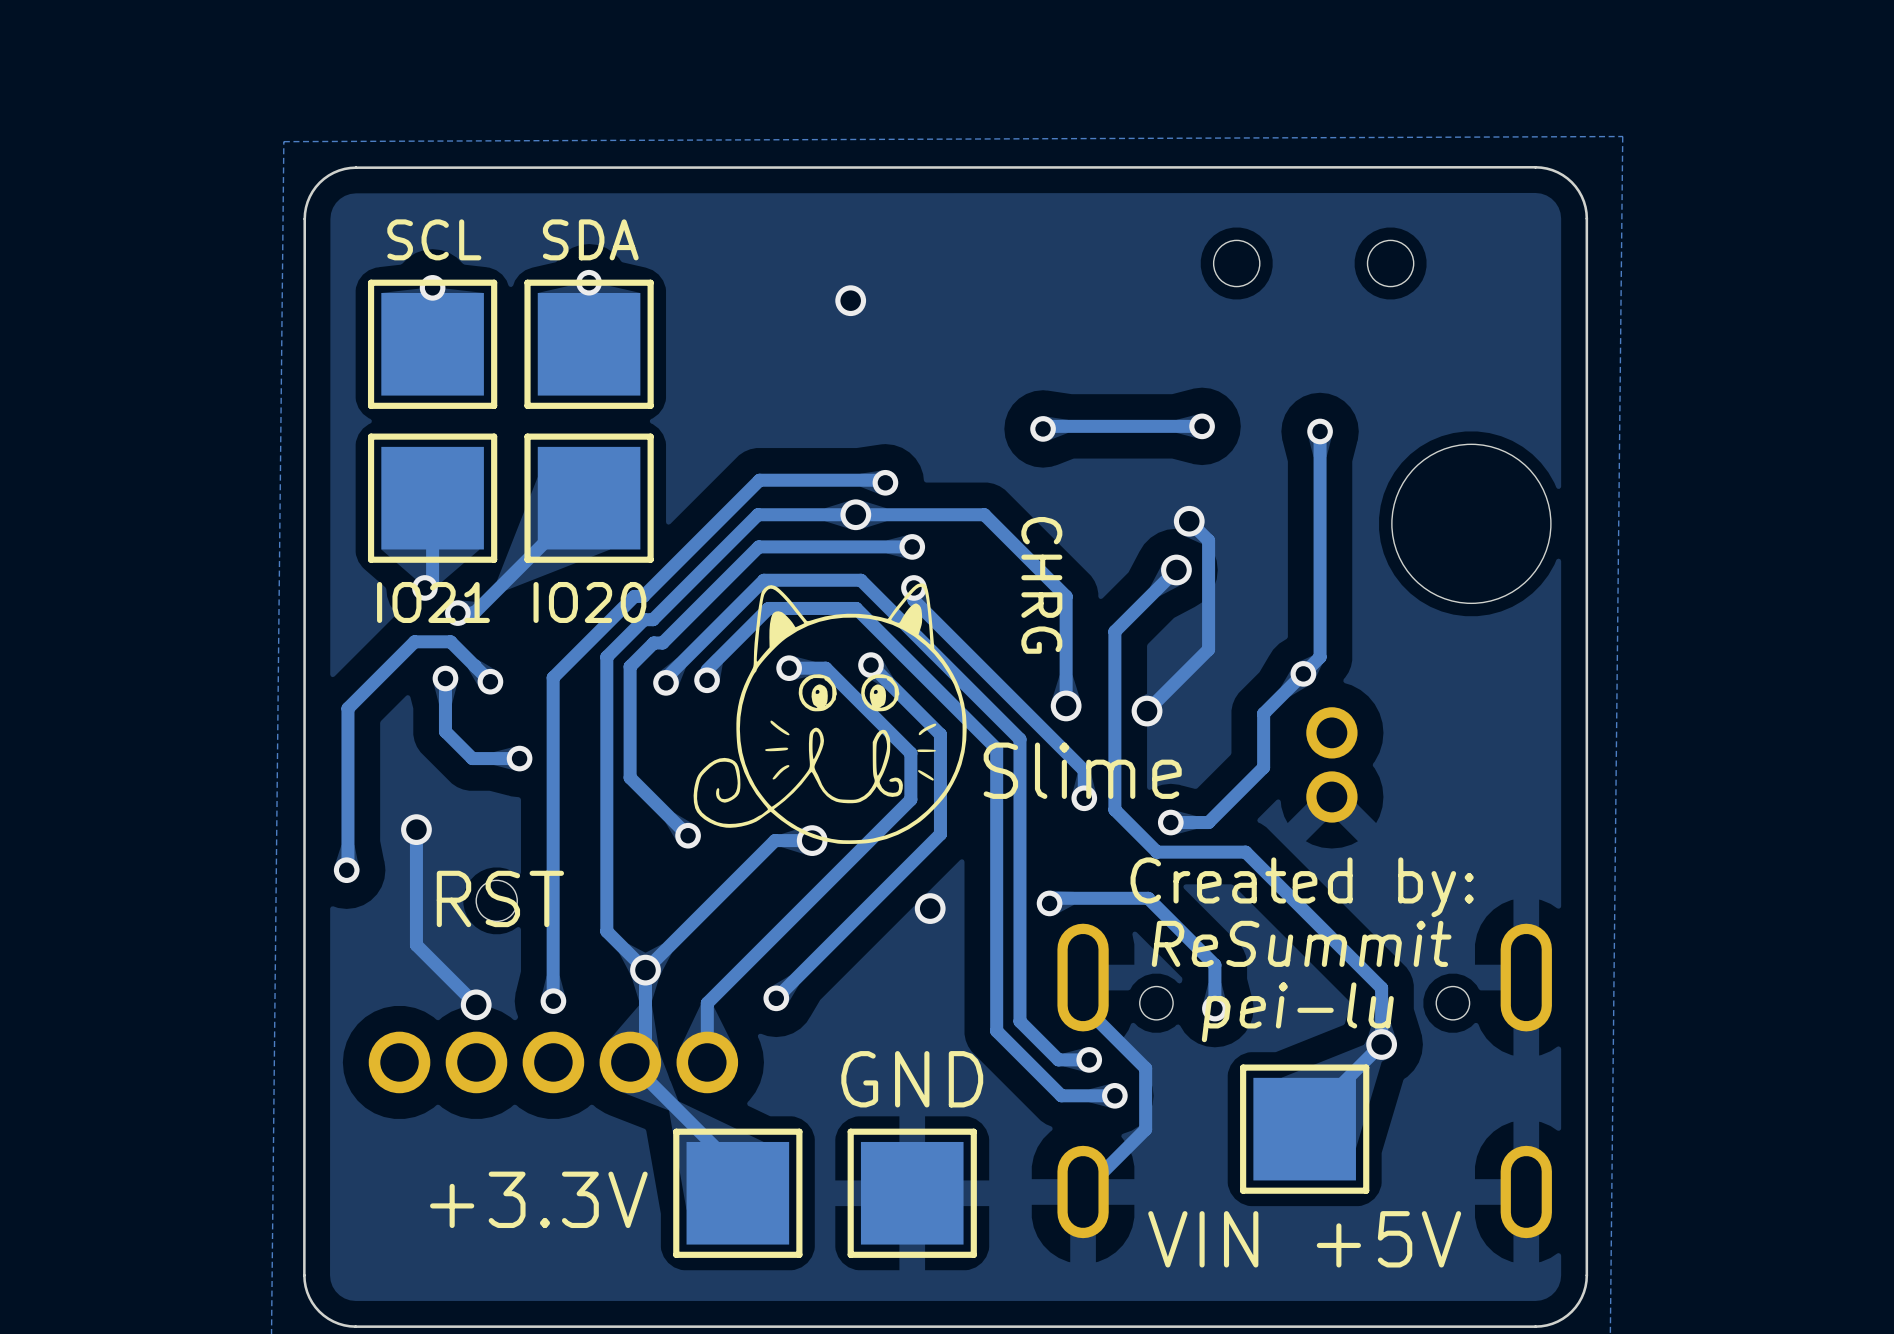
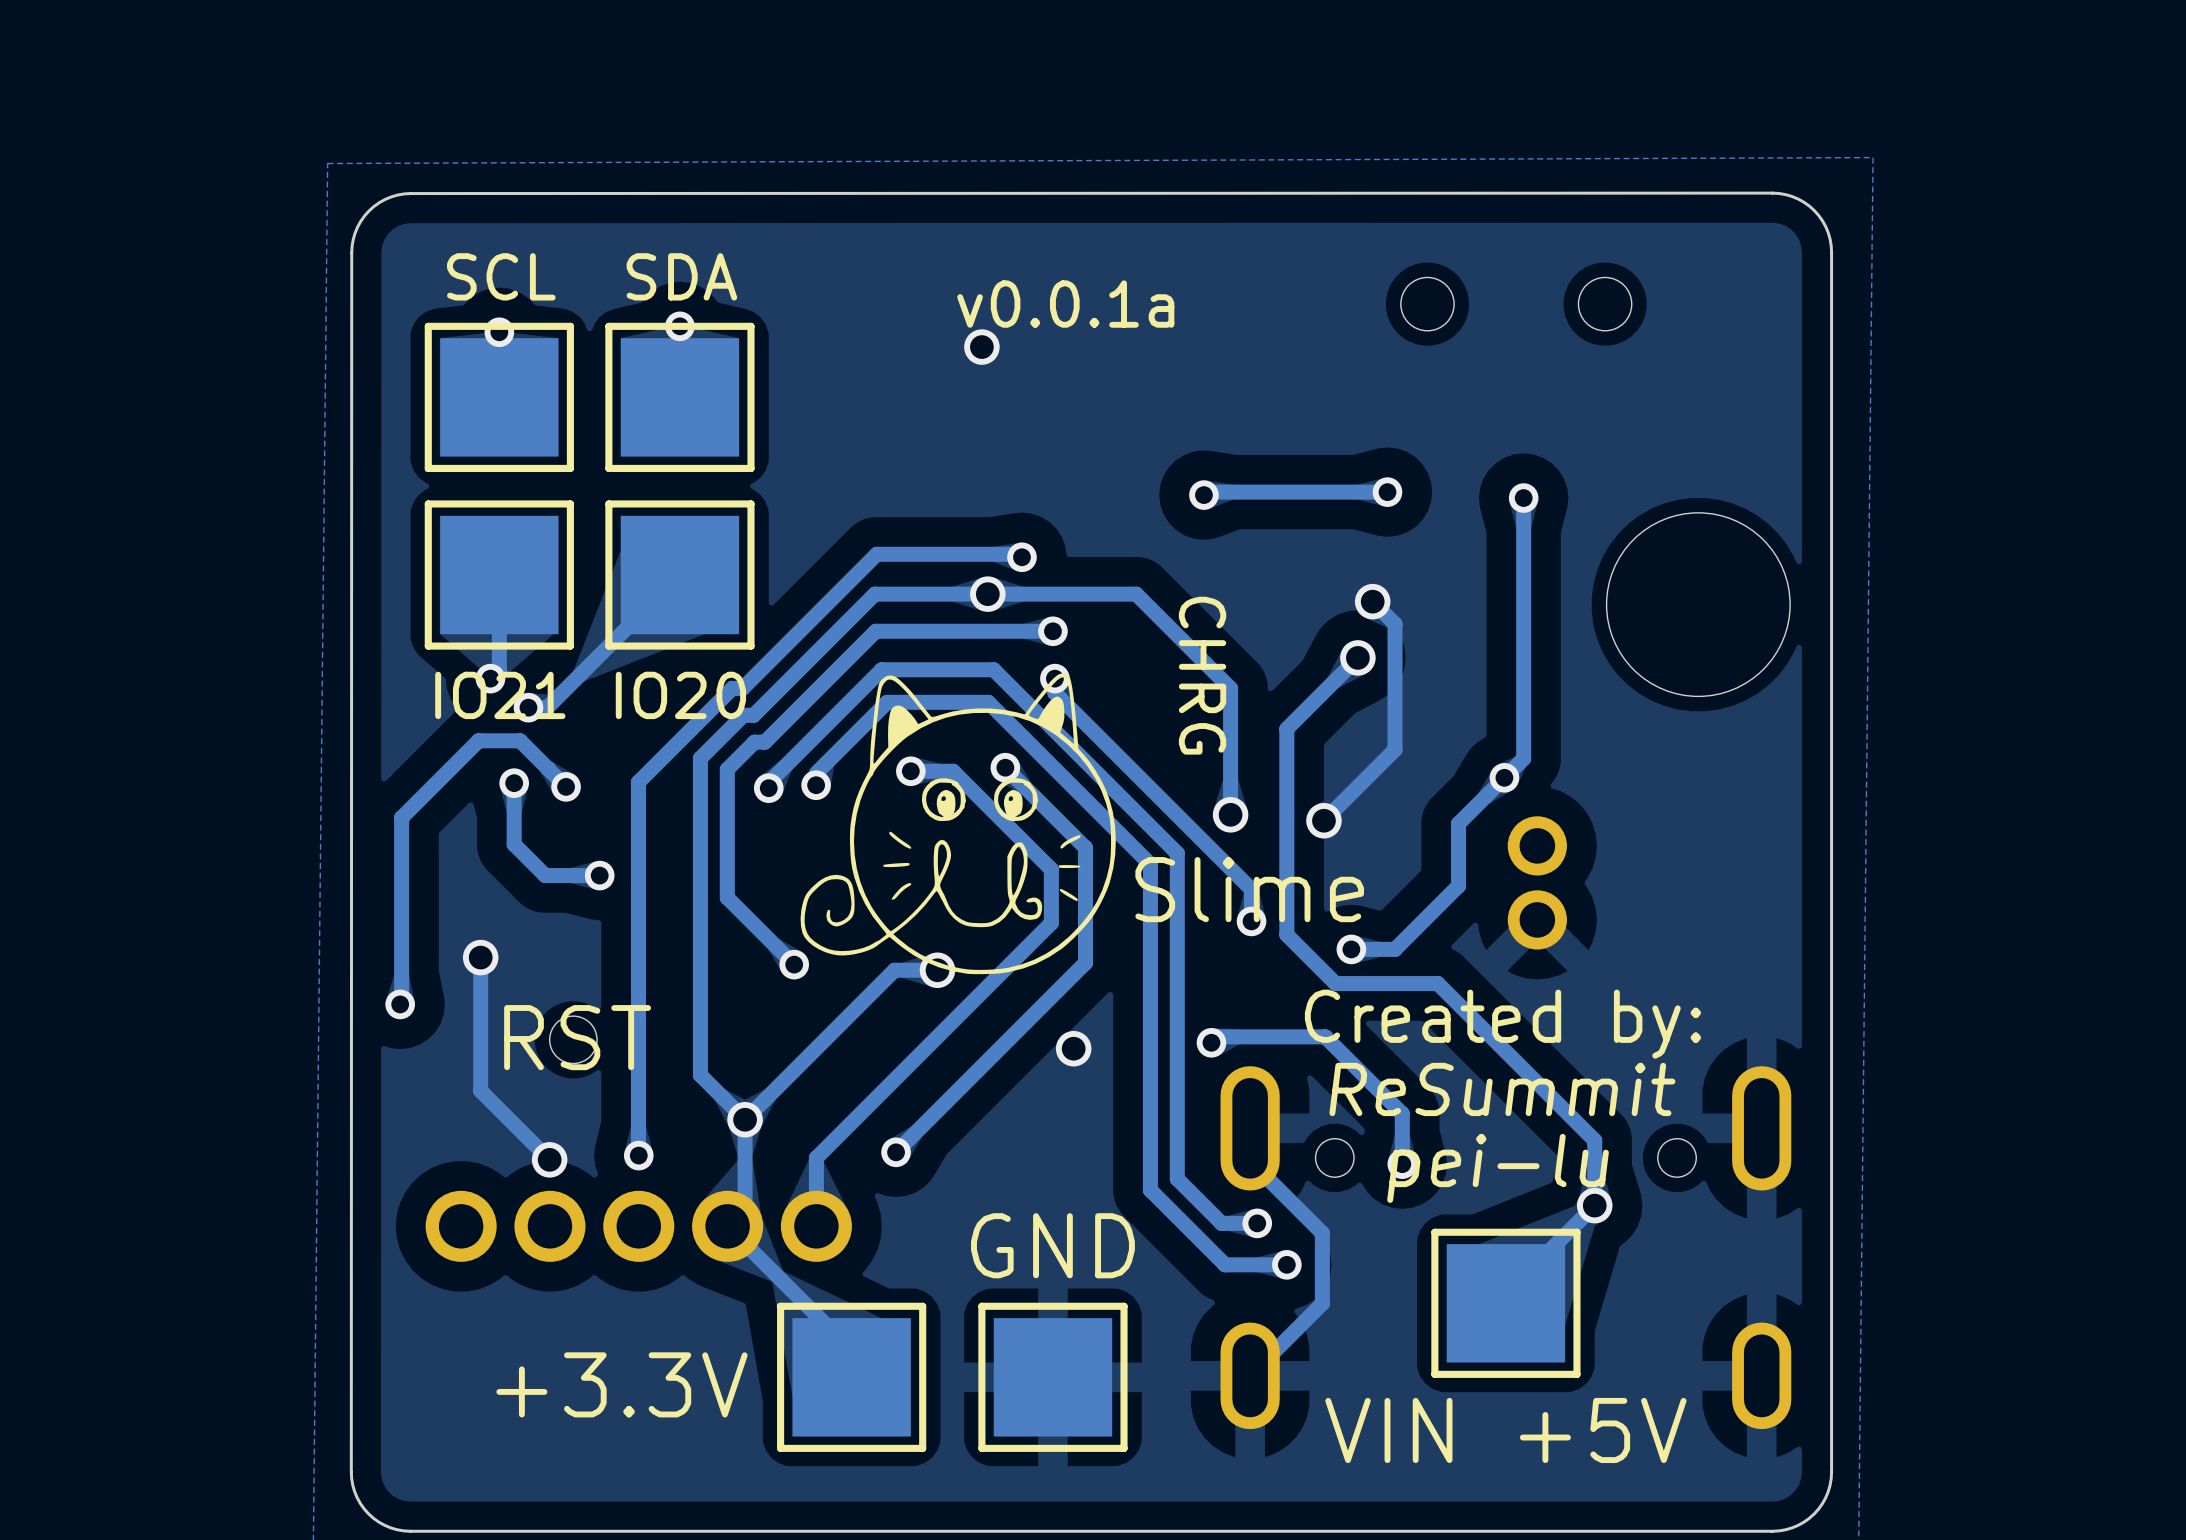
text: none -> v0.0.1a (1065, 304)

